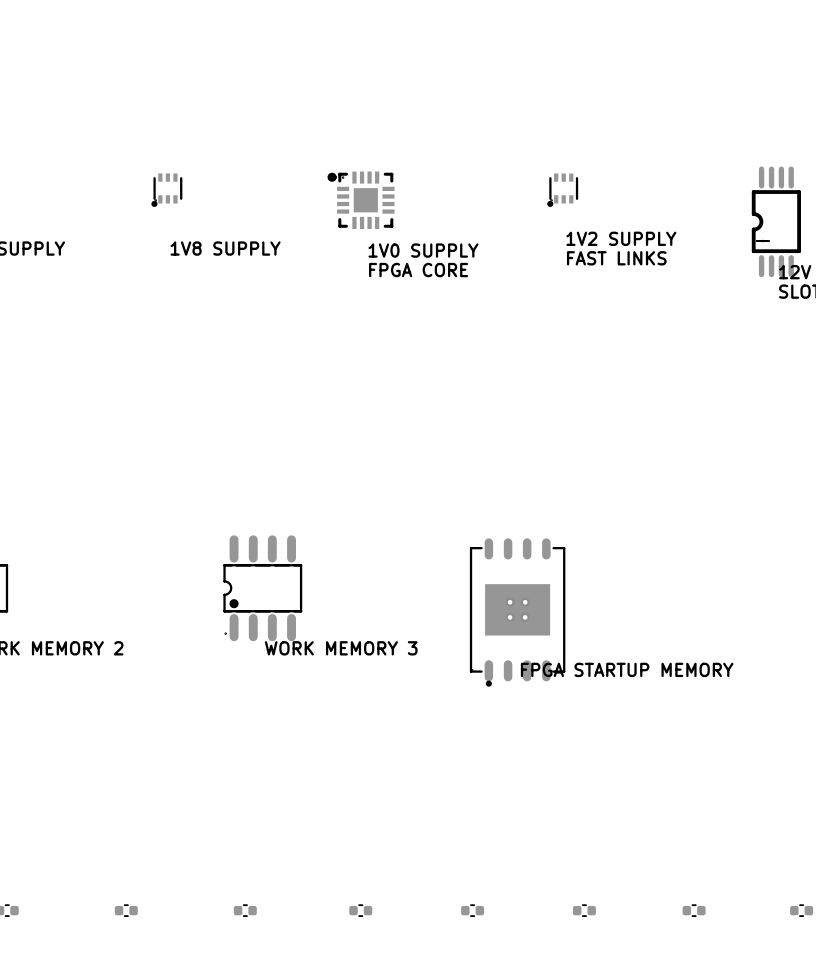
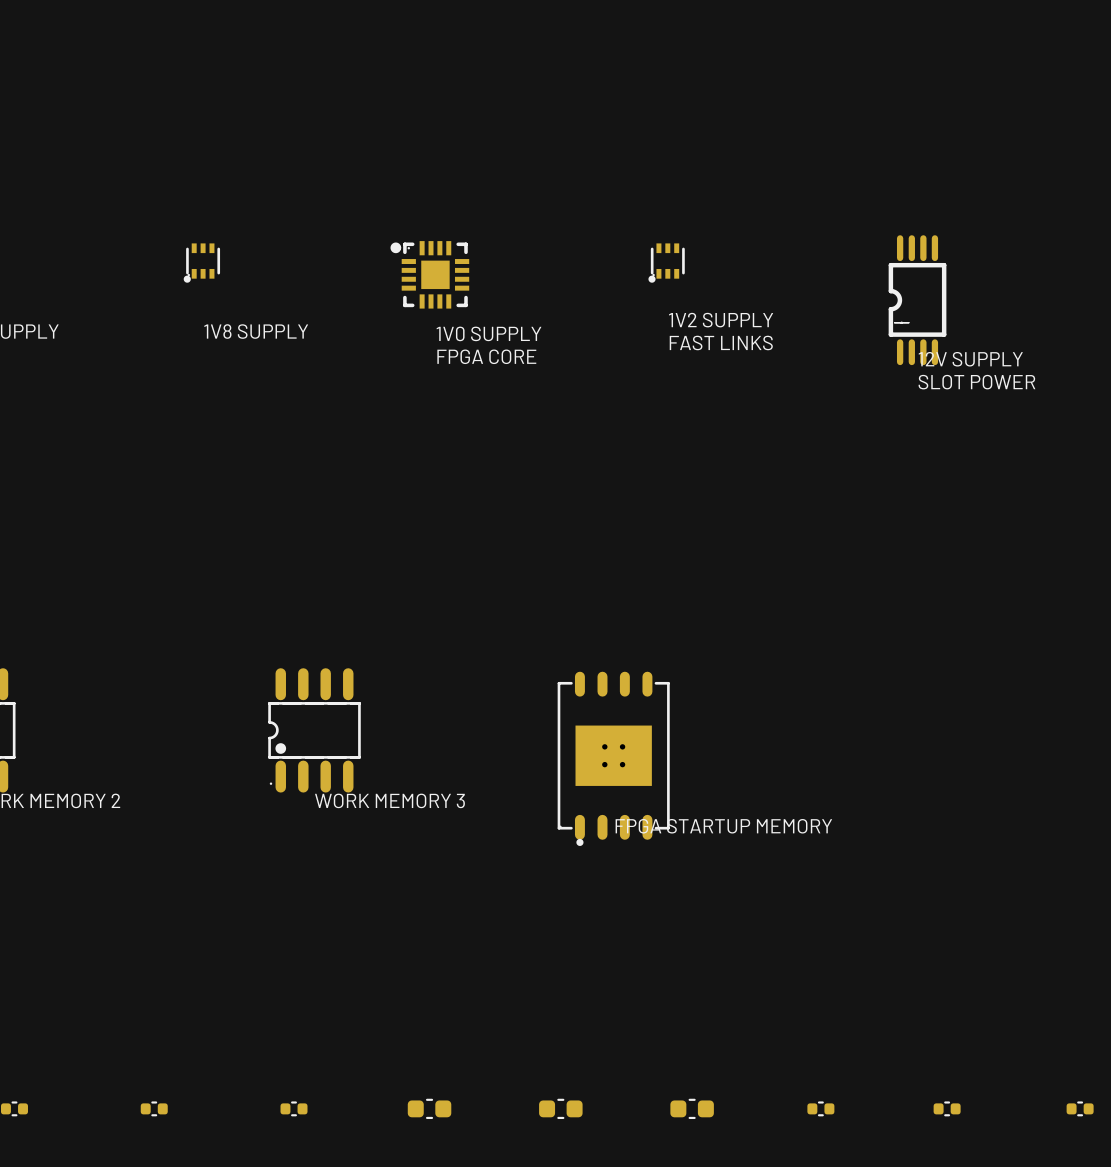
part footprint: [349, 904, 373, 917] -> [407, 1098, 452, 1120]
part footprint: [461, 904, 485, 917] -> [539, 1098, 583, 1120]
part footprint: [572, 904, 596, 917] -> [670, 1098, 714, 1120]

